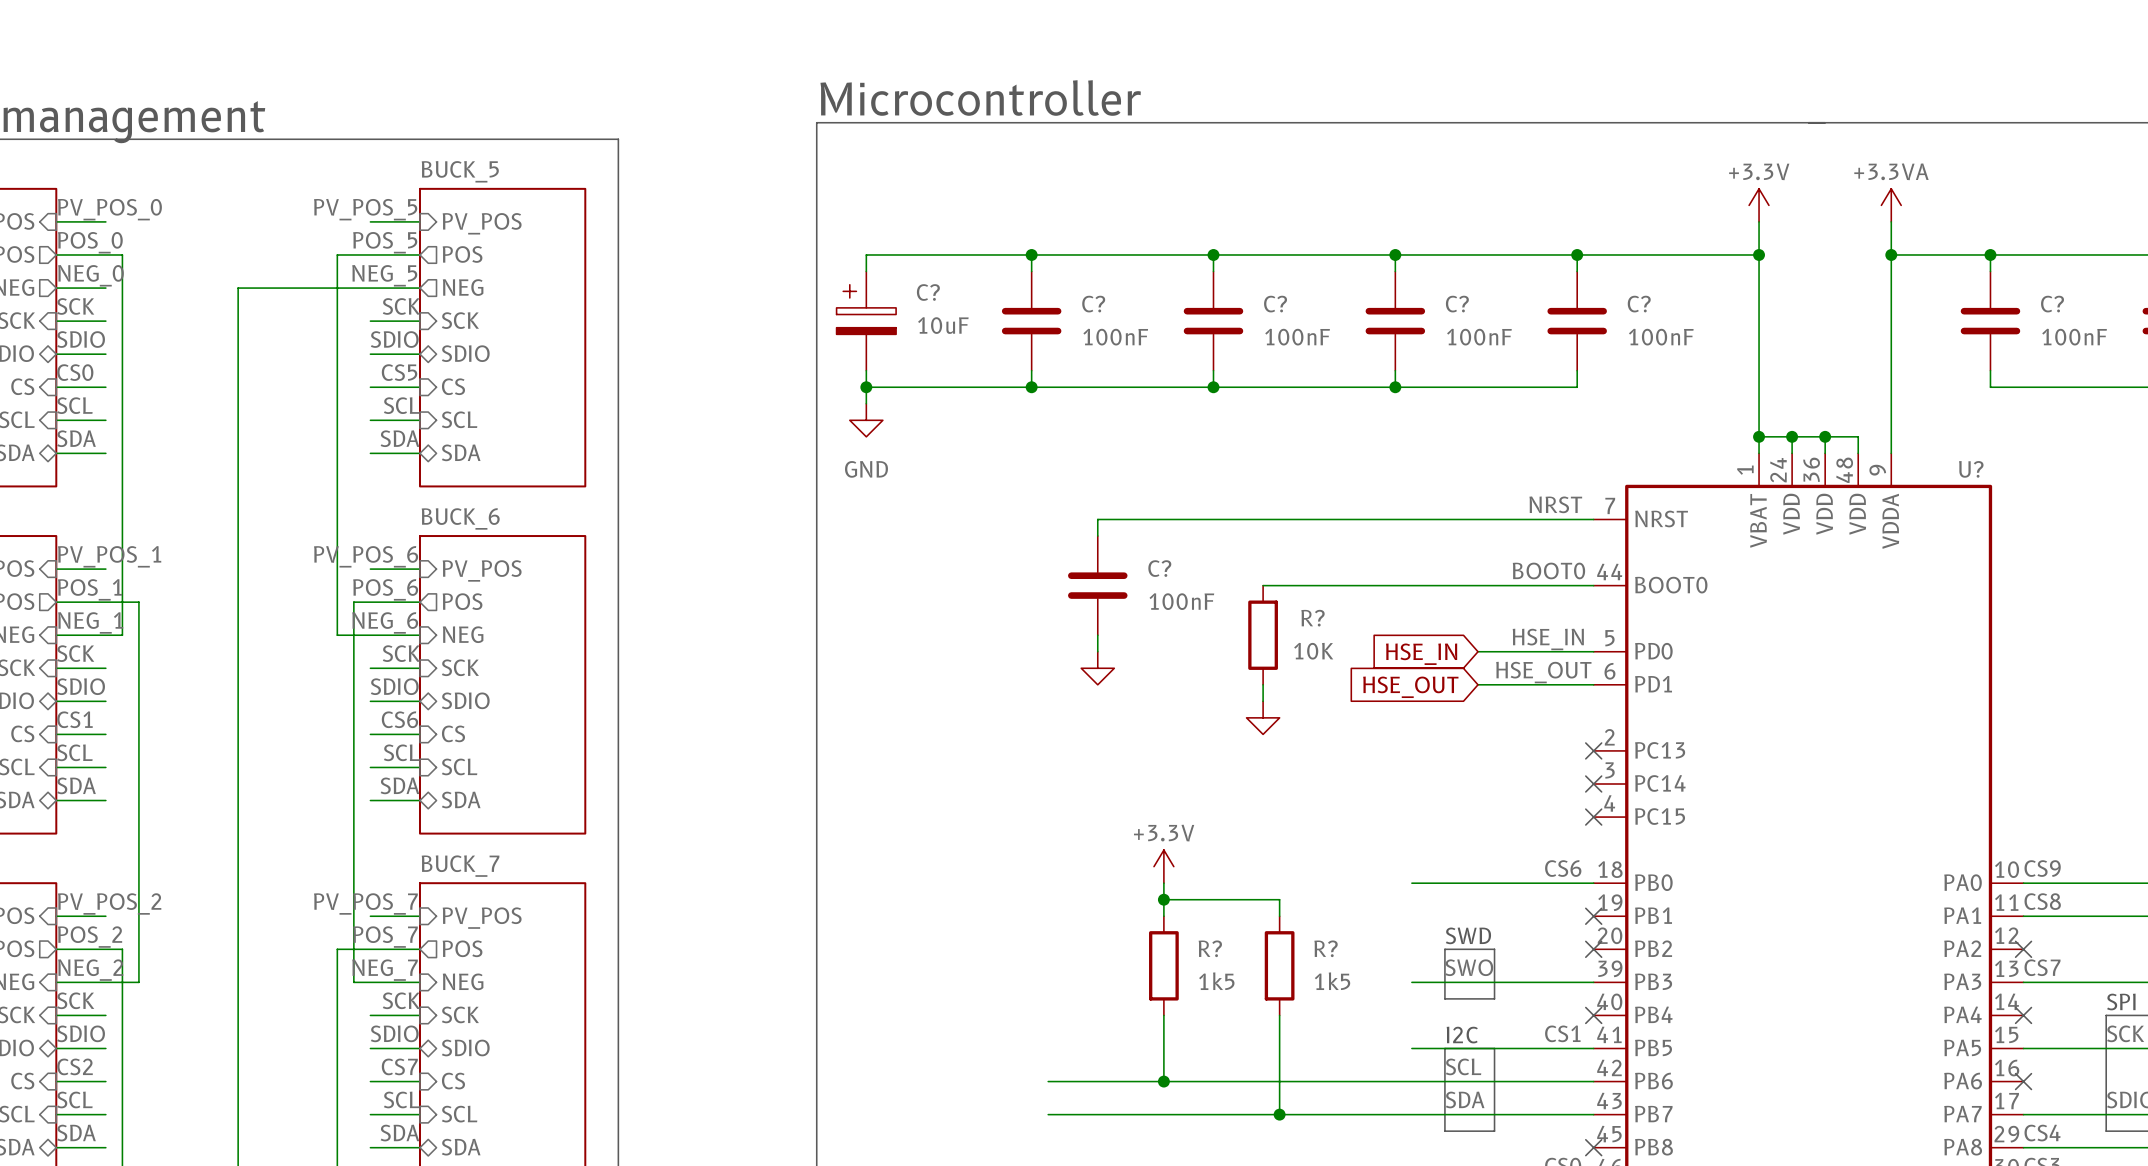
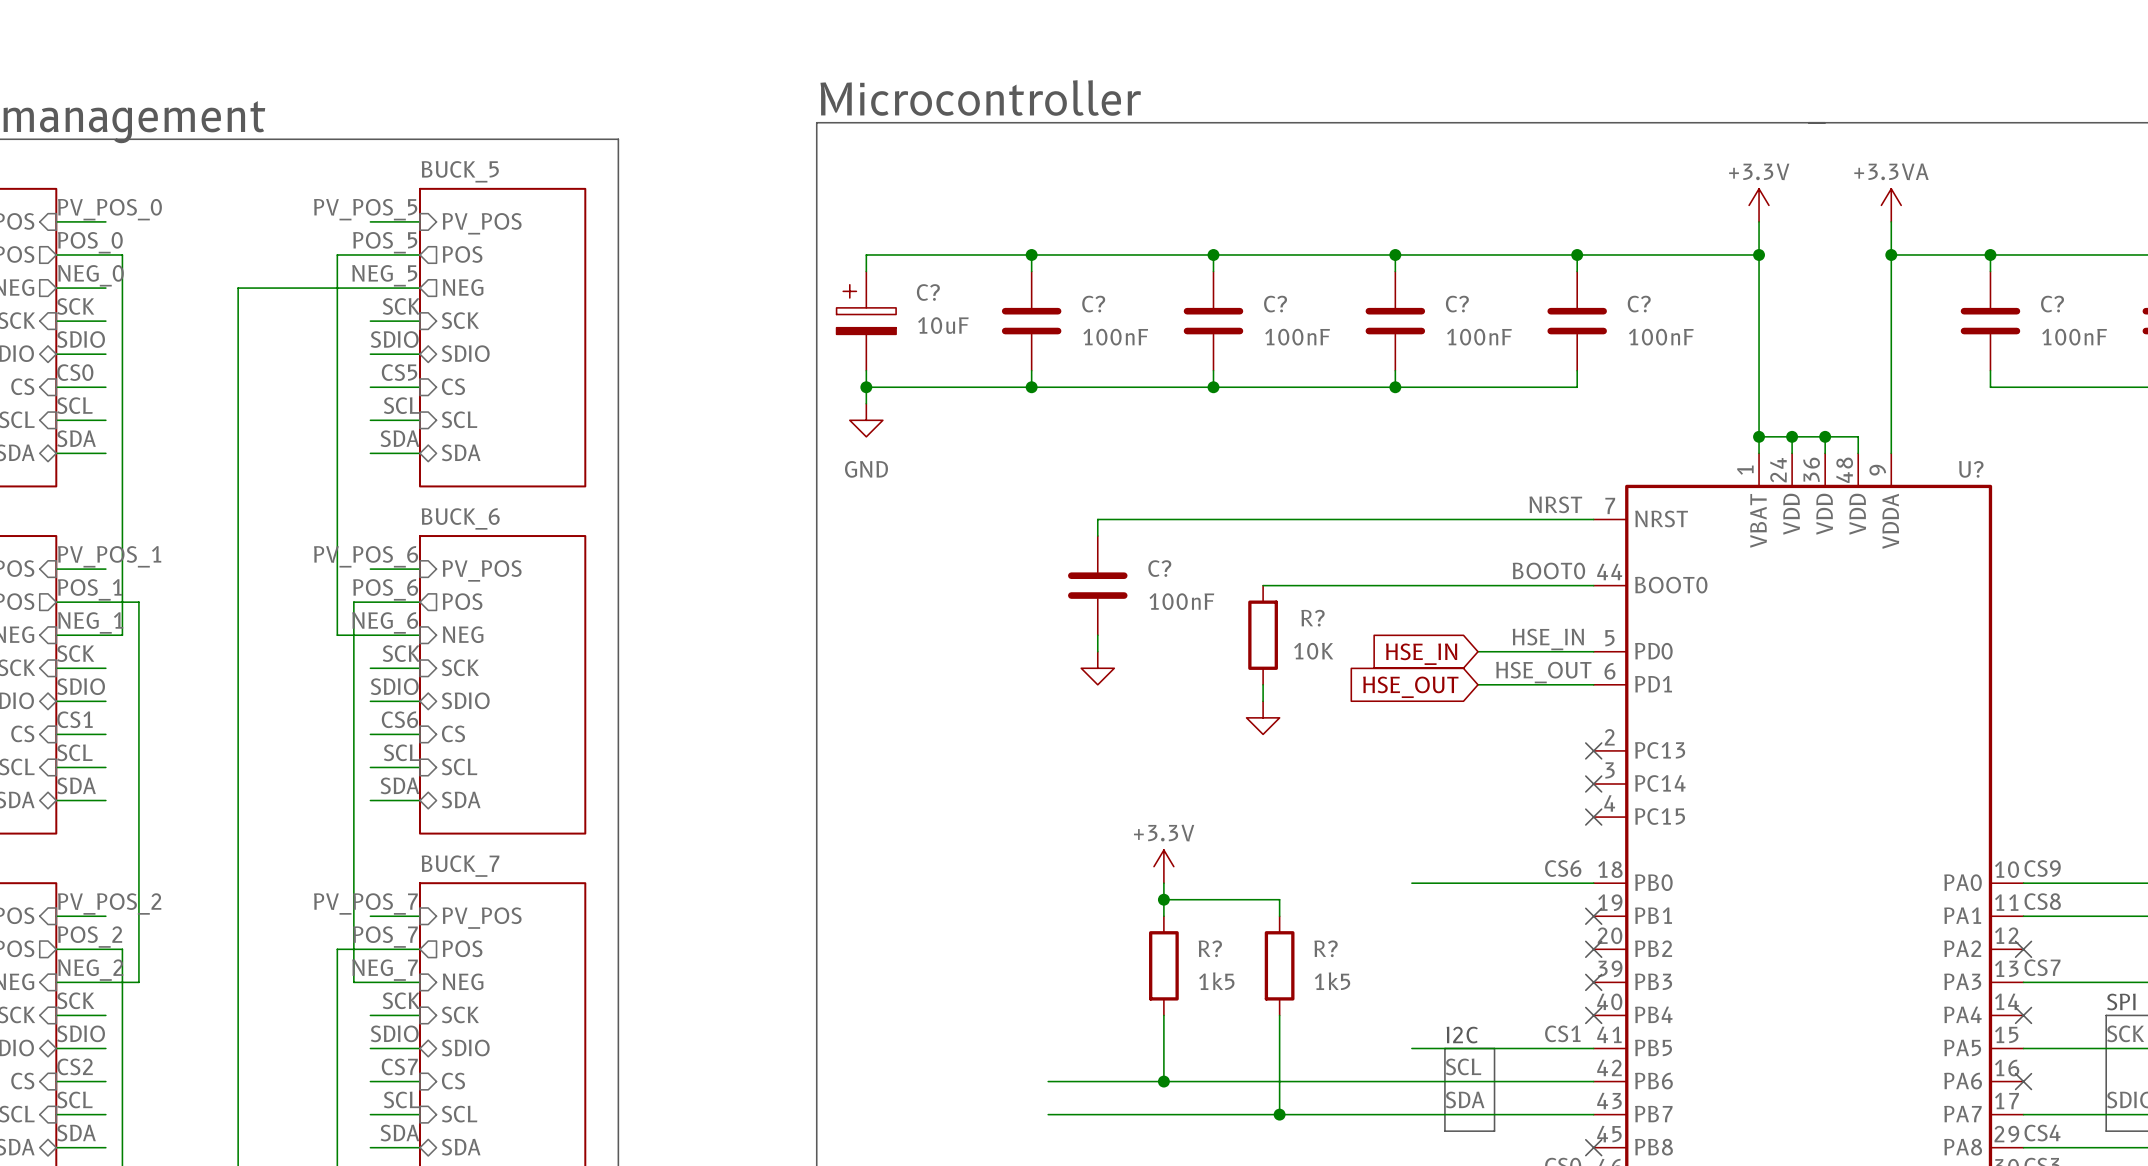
text: SWD (1468, 935) -> none
line: (1444, 949) (1494, 949) (1494, 998) (1444, 998) (1444, 949) -> none
label: SWO (1469, 967) -> none
wire: (1411, 982) (1593, 982) -> none
no-connect mark: none -> (1593, 982)

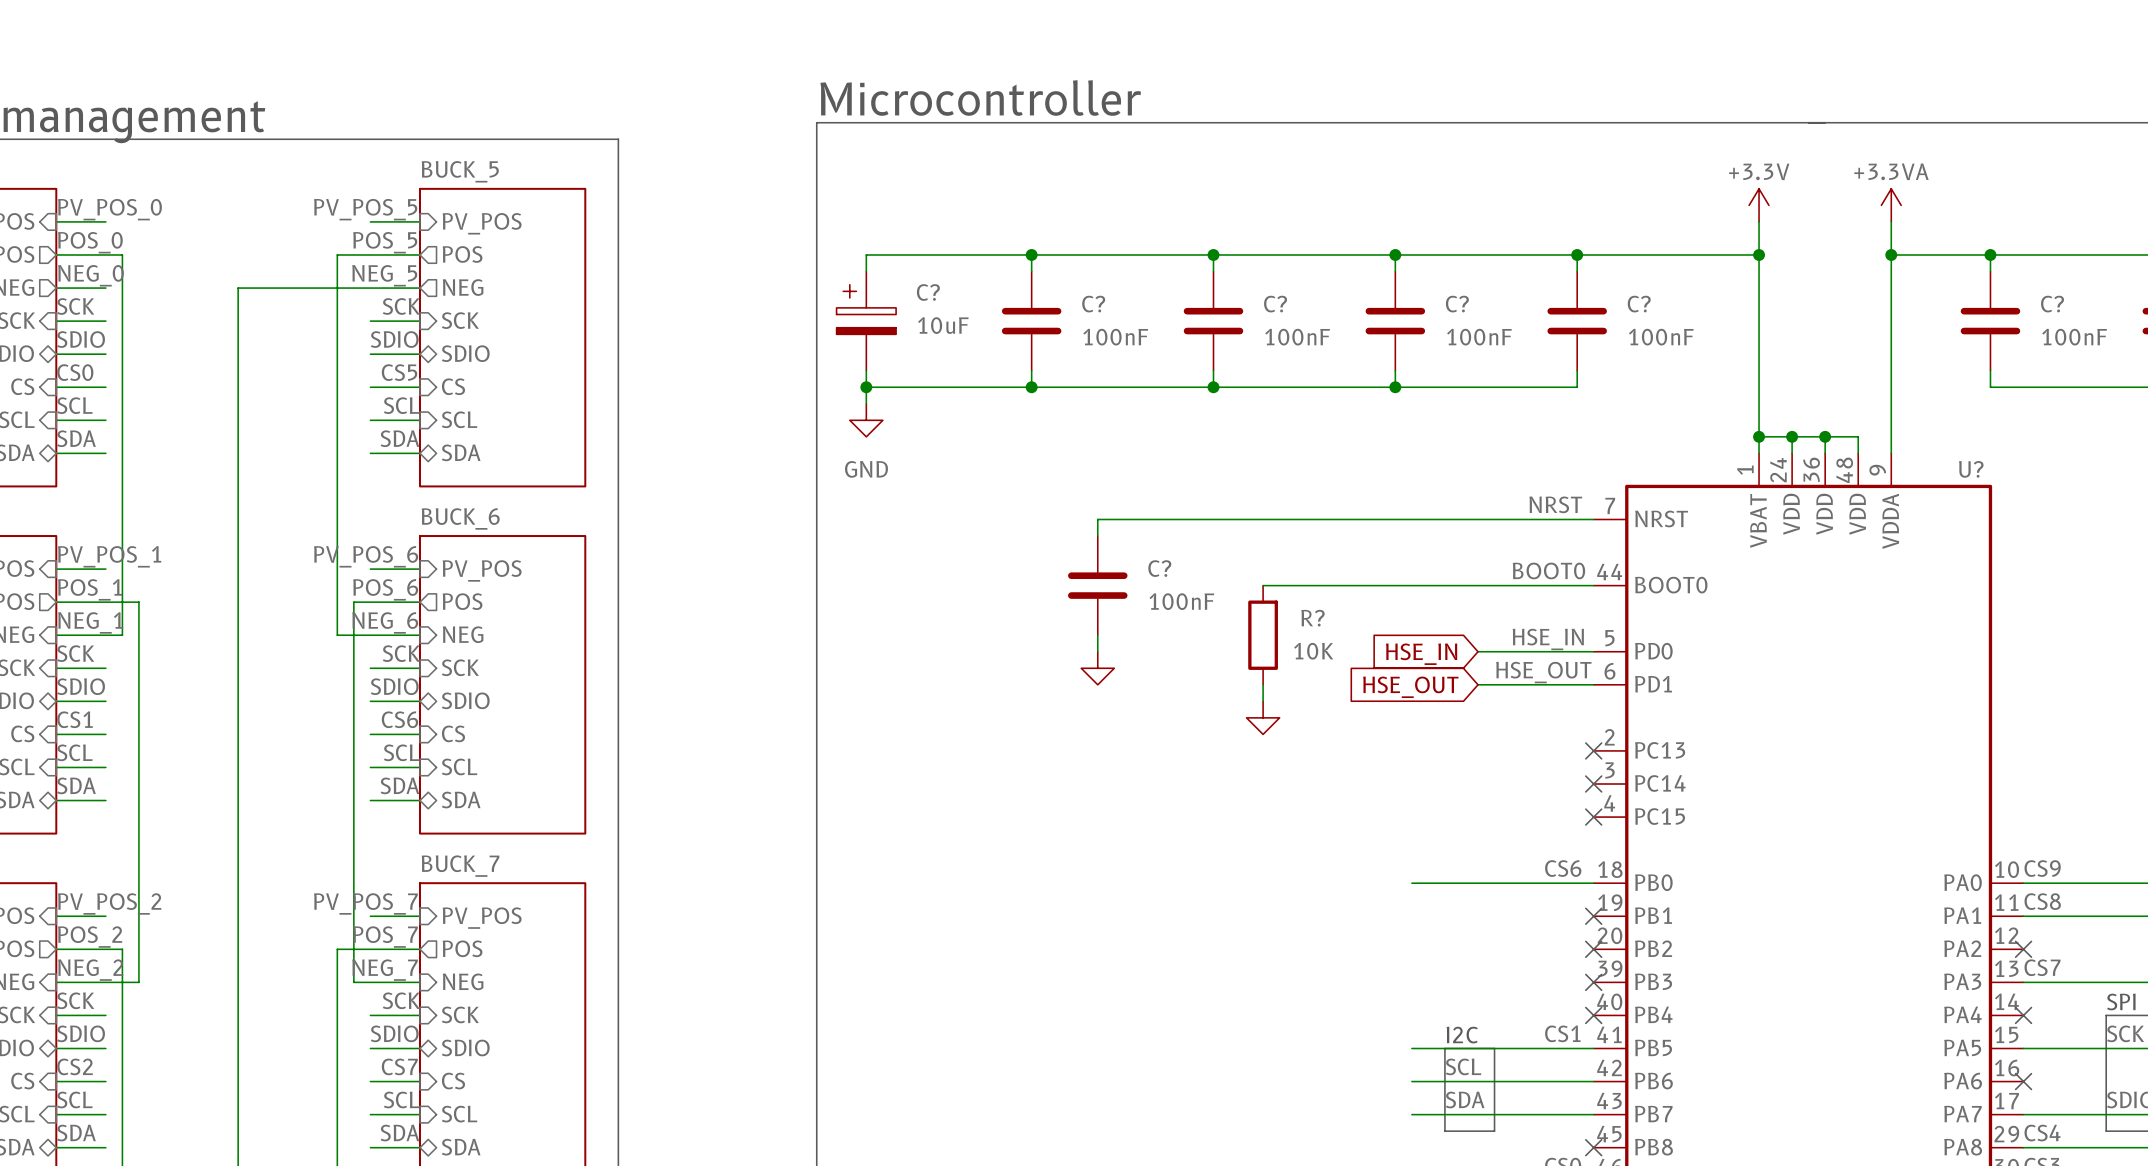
power symbol: +3.3V (1163, 866) -> none
wire: (1163, 883) (1163, 916) -> none
wire: (1163, 899) (1279, 899) (1279, 916) -> none
junction: (1163, 899) -> none
R?: 1k5 (1163, 965) -> none
R?: 1k5 (1279, 965) -> none
wire: (1163, 1015) (1163, 1081) -> none
wire: (1279, 1015) (1279, 1114) -> none
wire: (1048, 1081) (1411, 1081) -> none
junction: (1163, 1081) -> none
wire: (1048, 1114) (1411, 1114) -> none
junction: (1279, 1114) -> none

